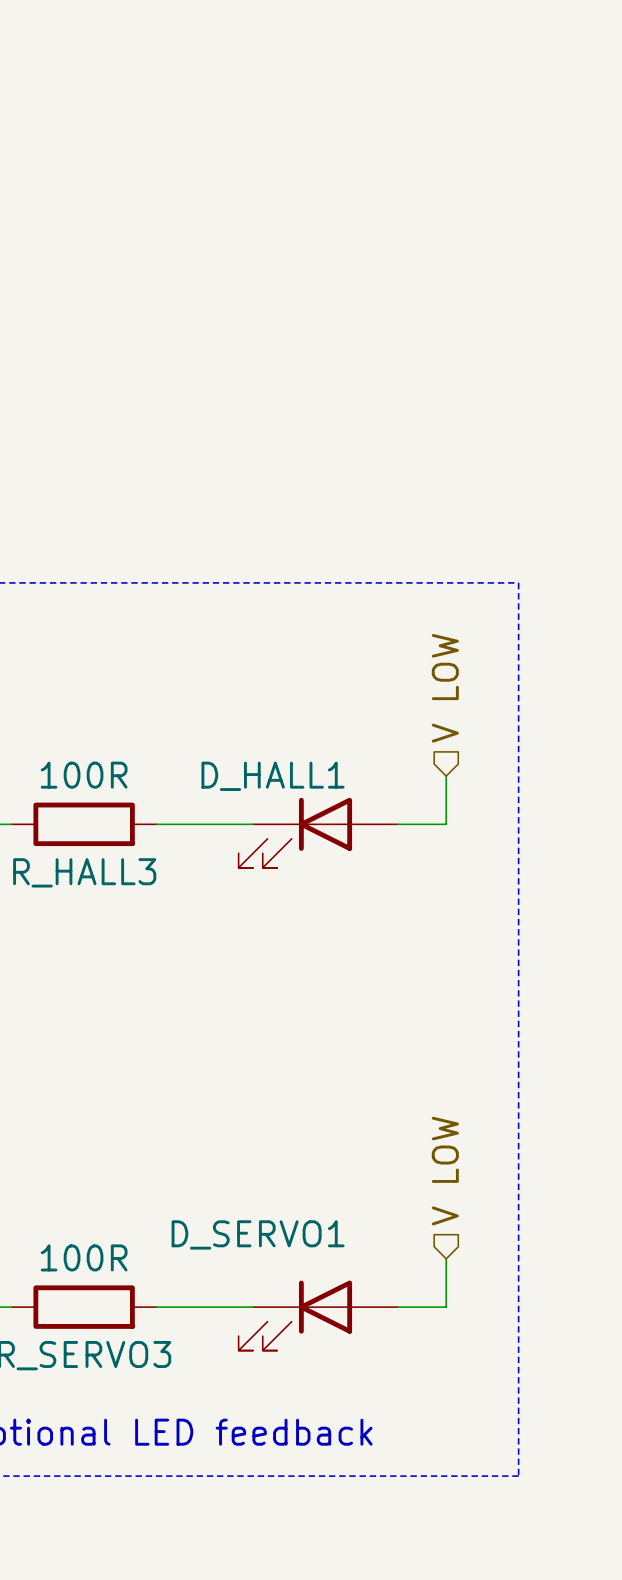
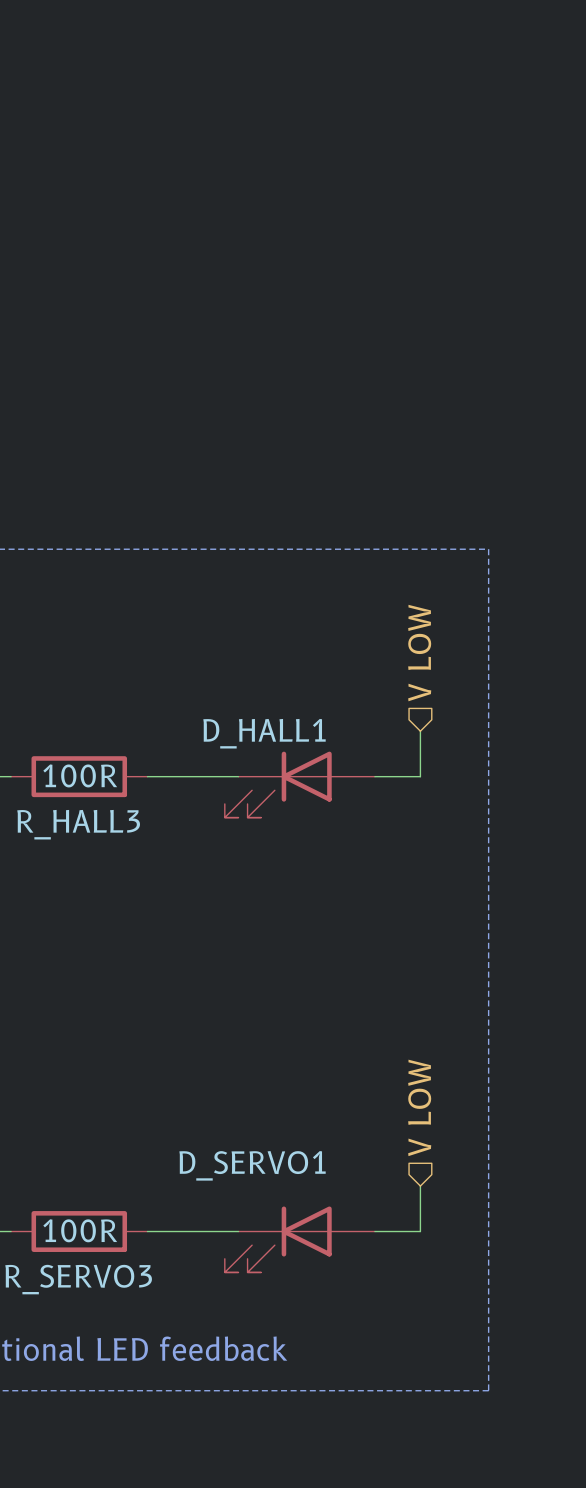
R_HALL3 value position: 100R (84, 775) -> 100R (80, 775)
R_SERVO3 value position: 100R (84, 1257) -> 100R (80, 1230)

